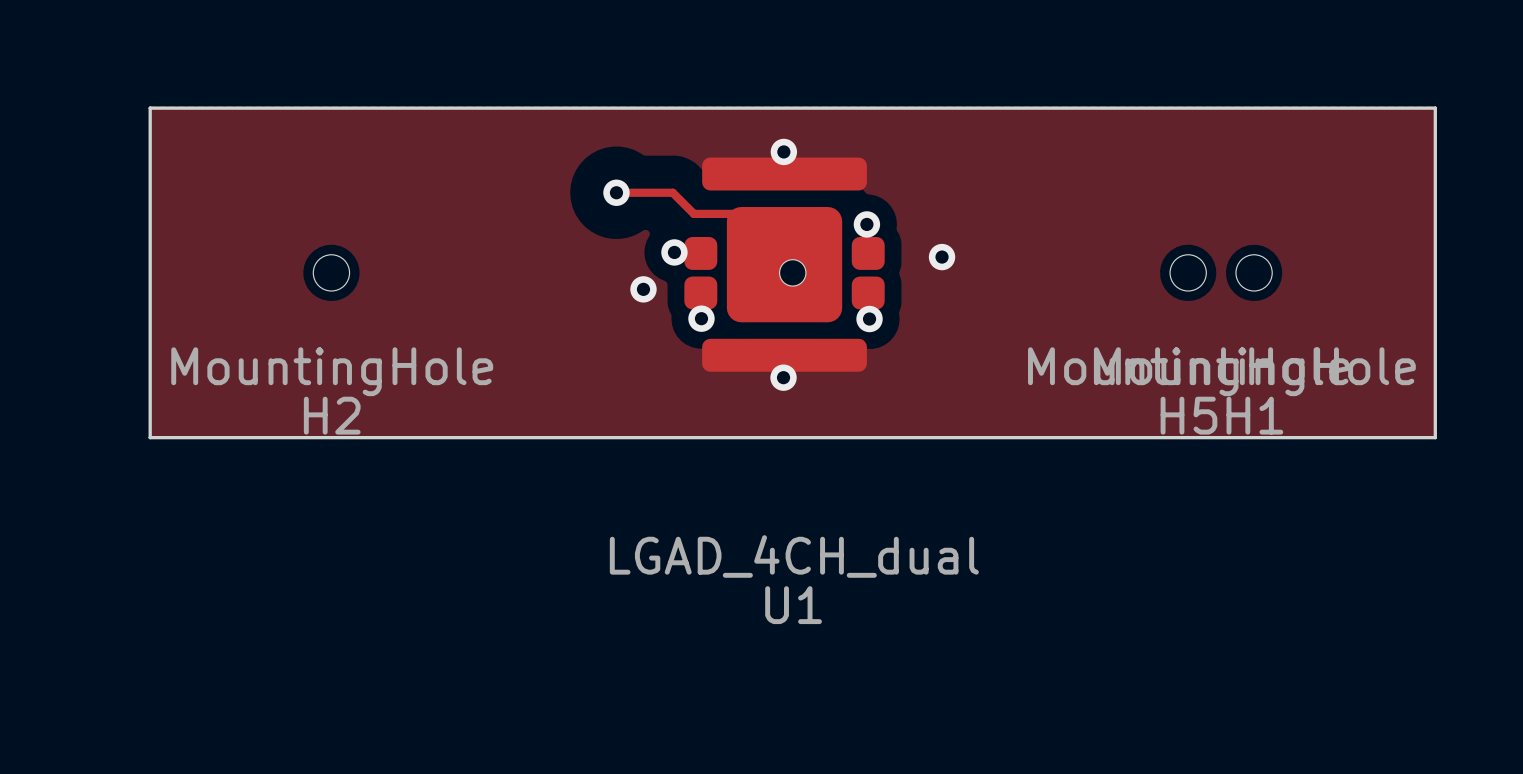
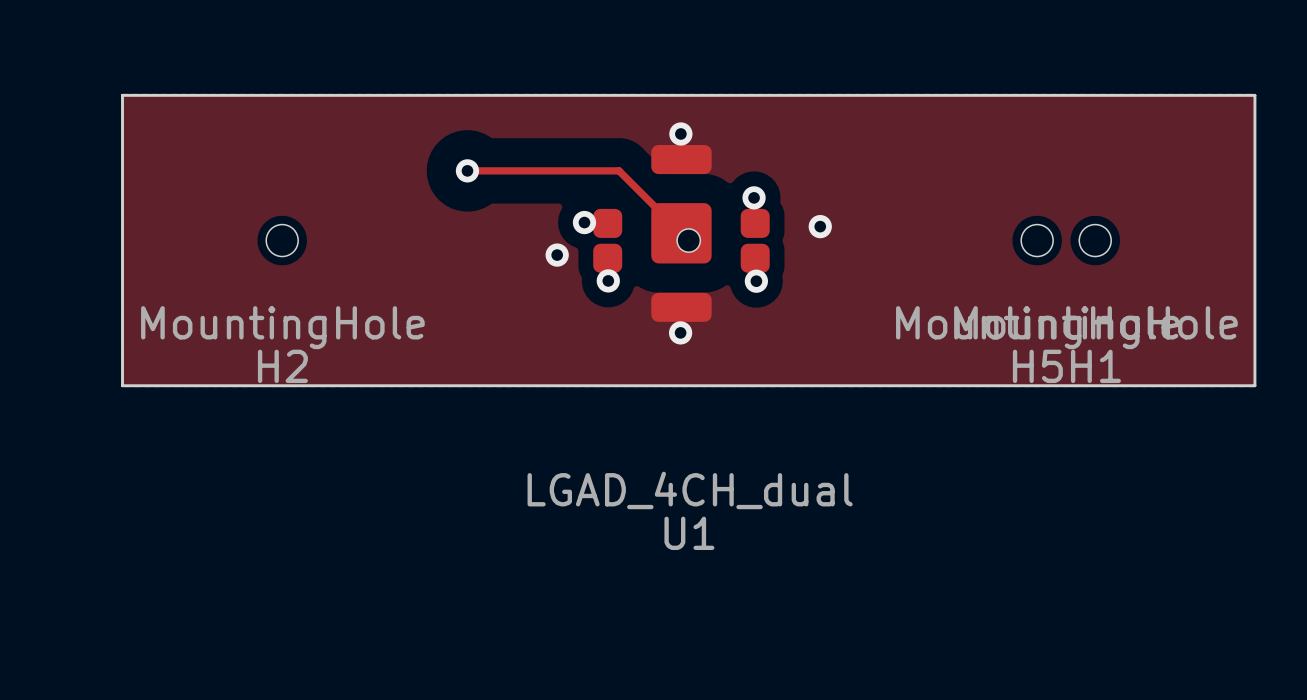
U1 footprint: [684, 157, 885, 372] -> [593, 145, 770, 322]
track: (616, 192) (672, 192) (693, 213) (733, 213) -> (467, 170) (619, 170) (636, 188)
via position: (616, 192) -> (467, 170)

